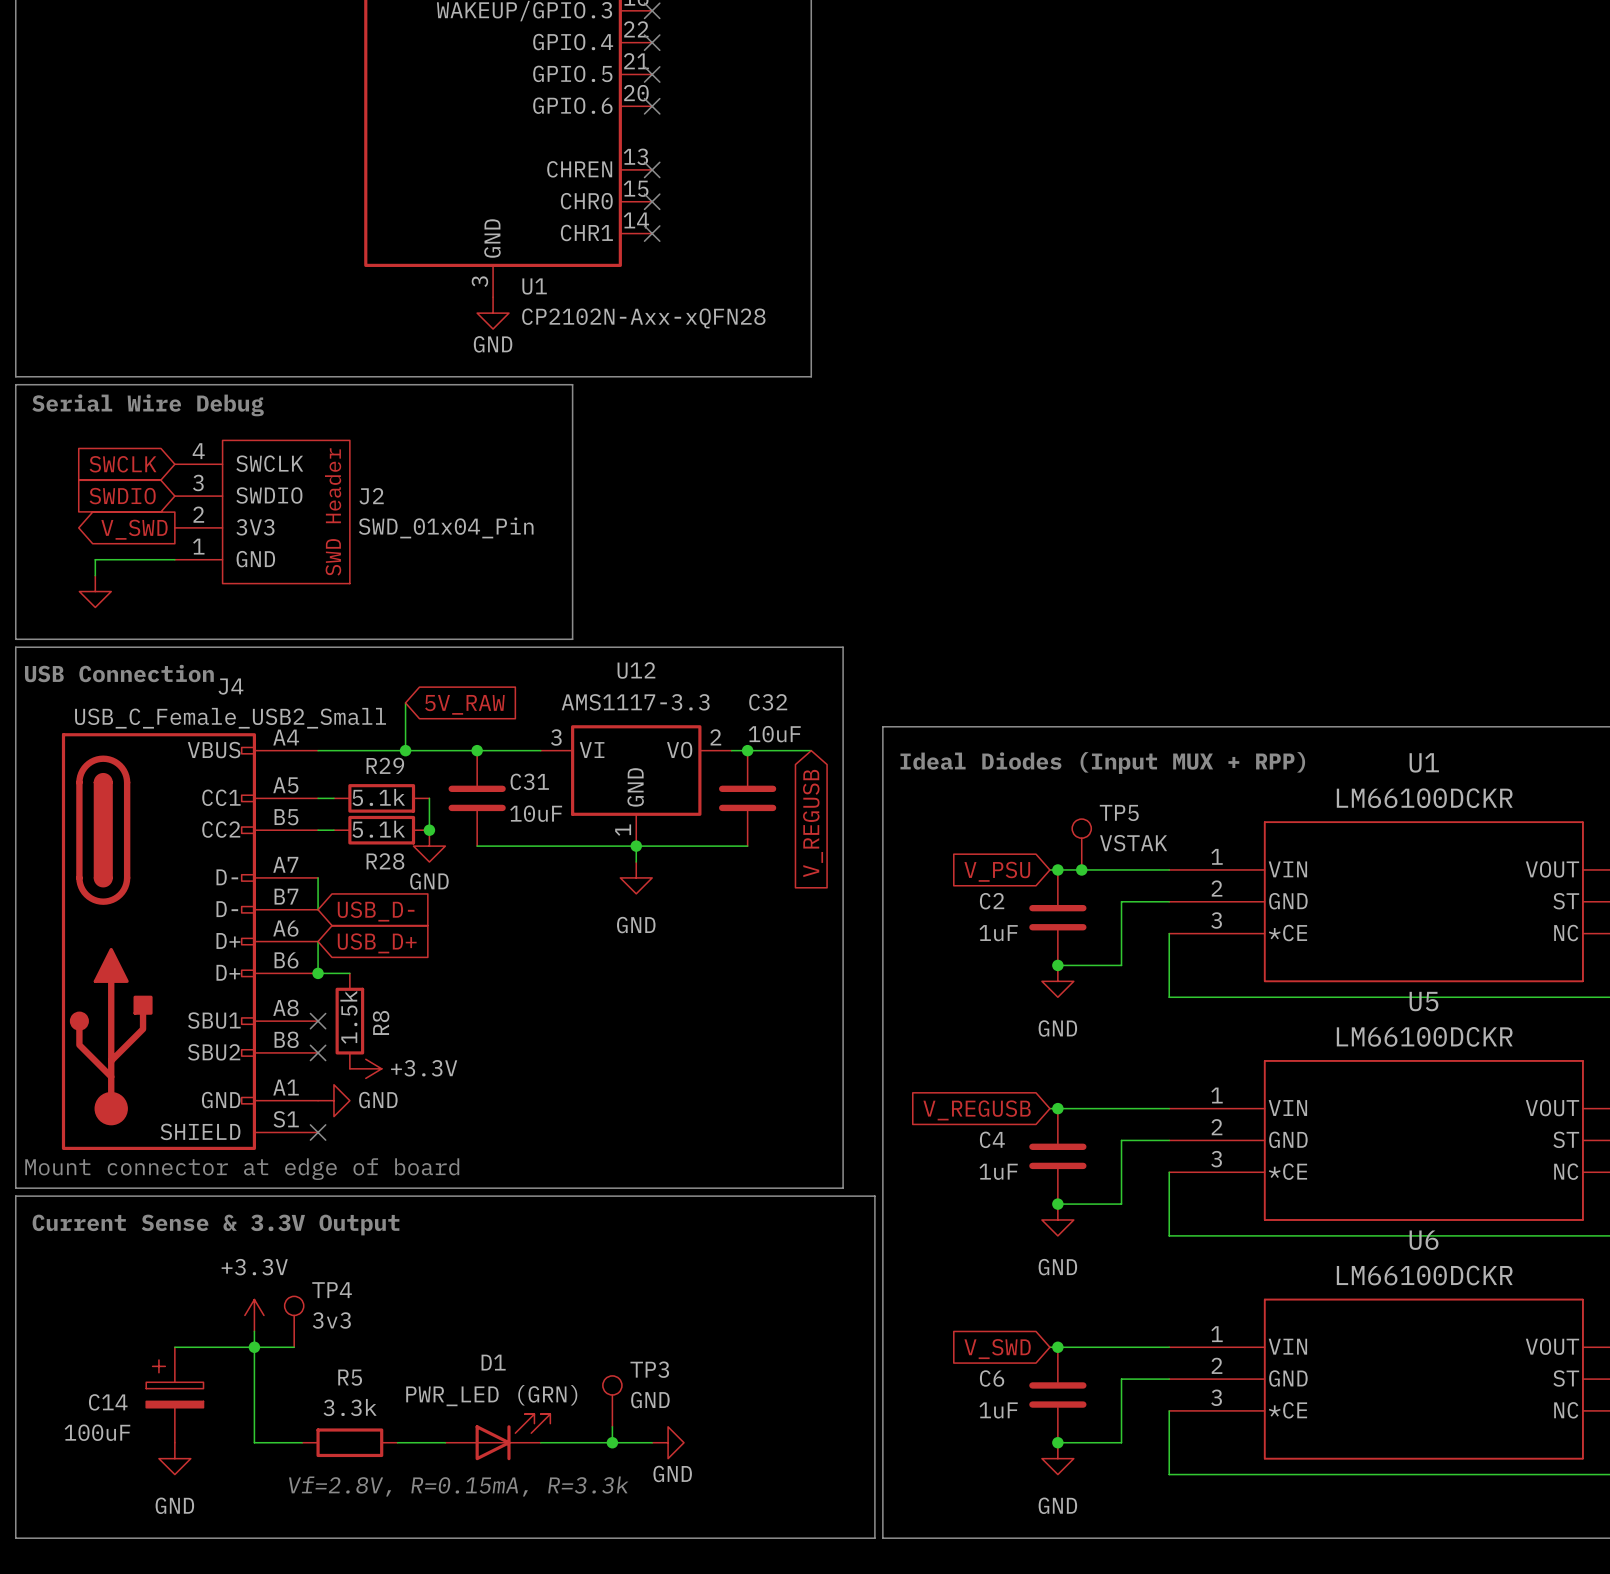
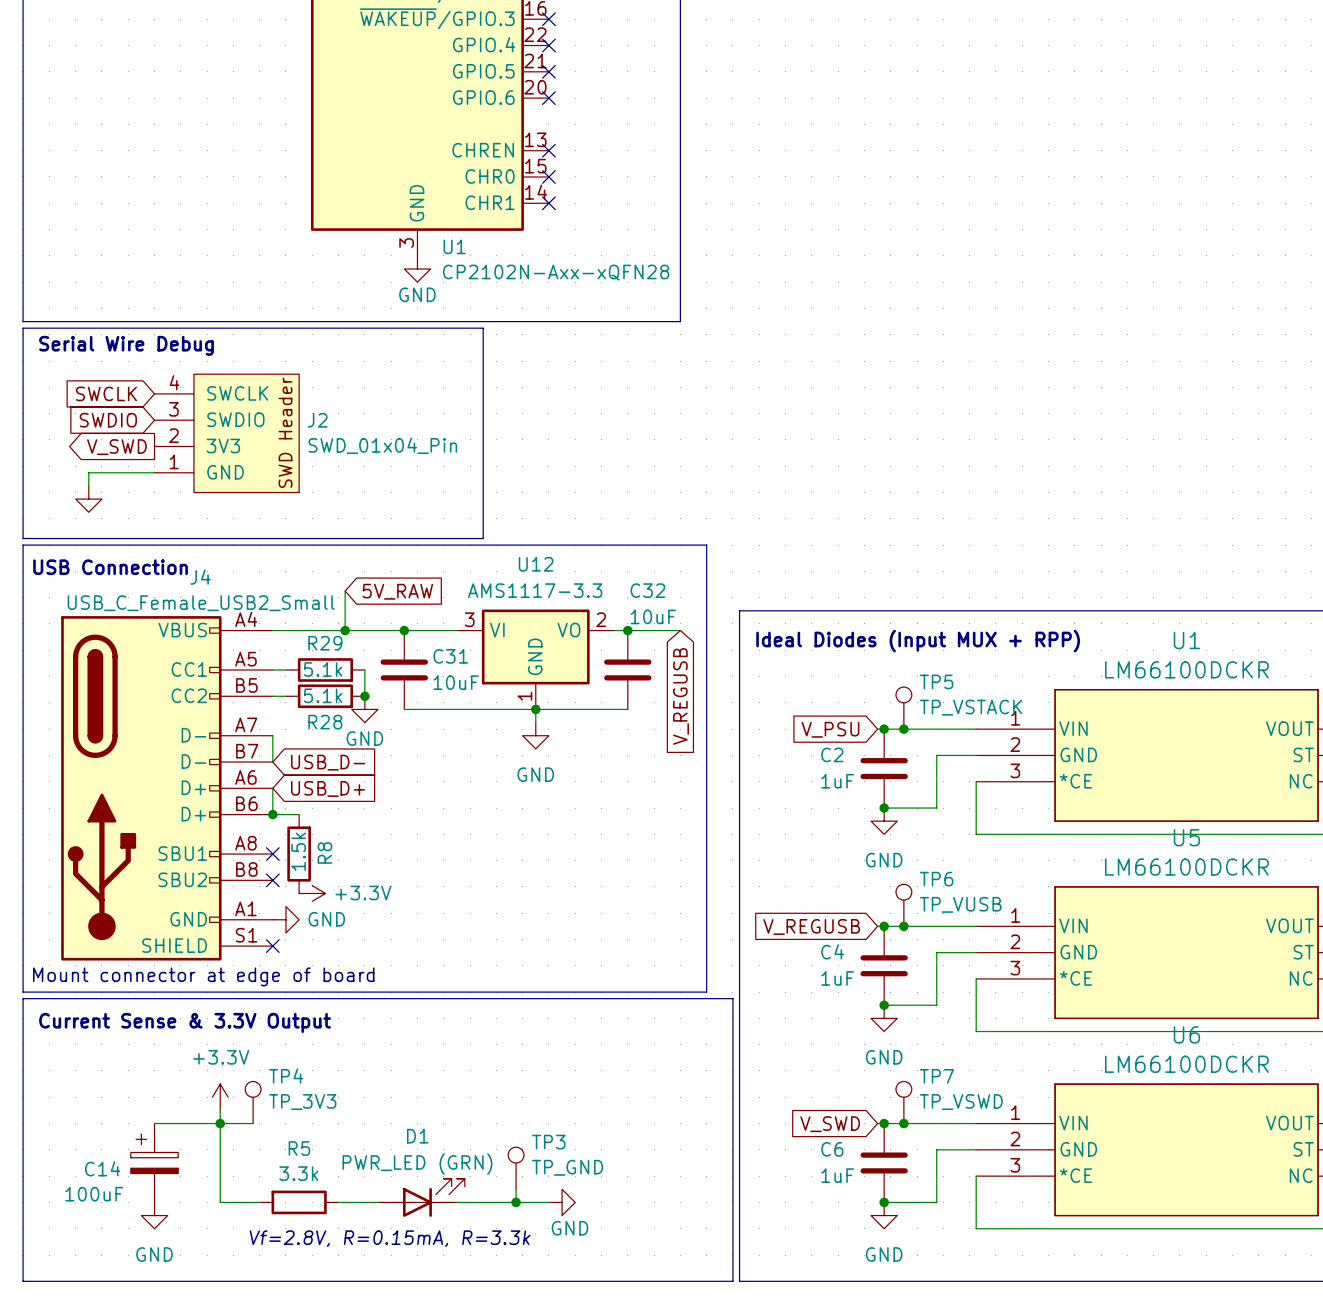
TP5 value: VSTAK (1133, 843) -> TP_VSTACK (971, 707)
TP6: none -> TP_VUSB (903, 905)
junction: none -> (903, 926)
TP4 value: 3v3 (331, 1320) -> TP_3V3 (302, 1102)
TP7: none -> TP_VSWD (903, 1102)
junction: none -> (903, 1123)
TP3 value: GND (650, 1400) -> TP_GND (567, 1167)

